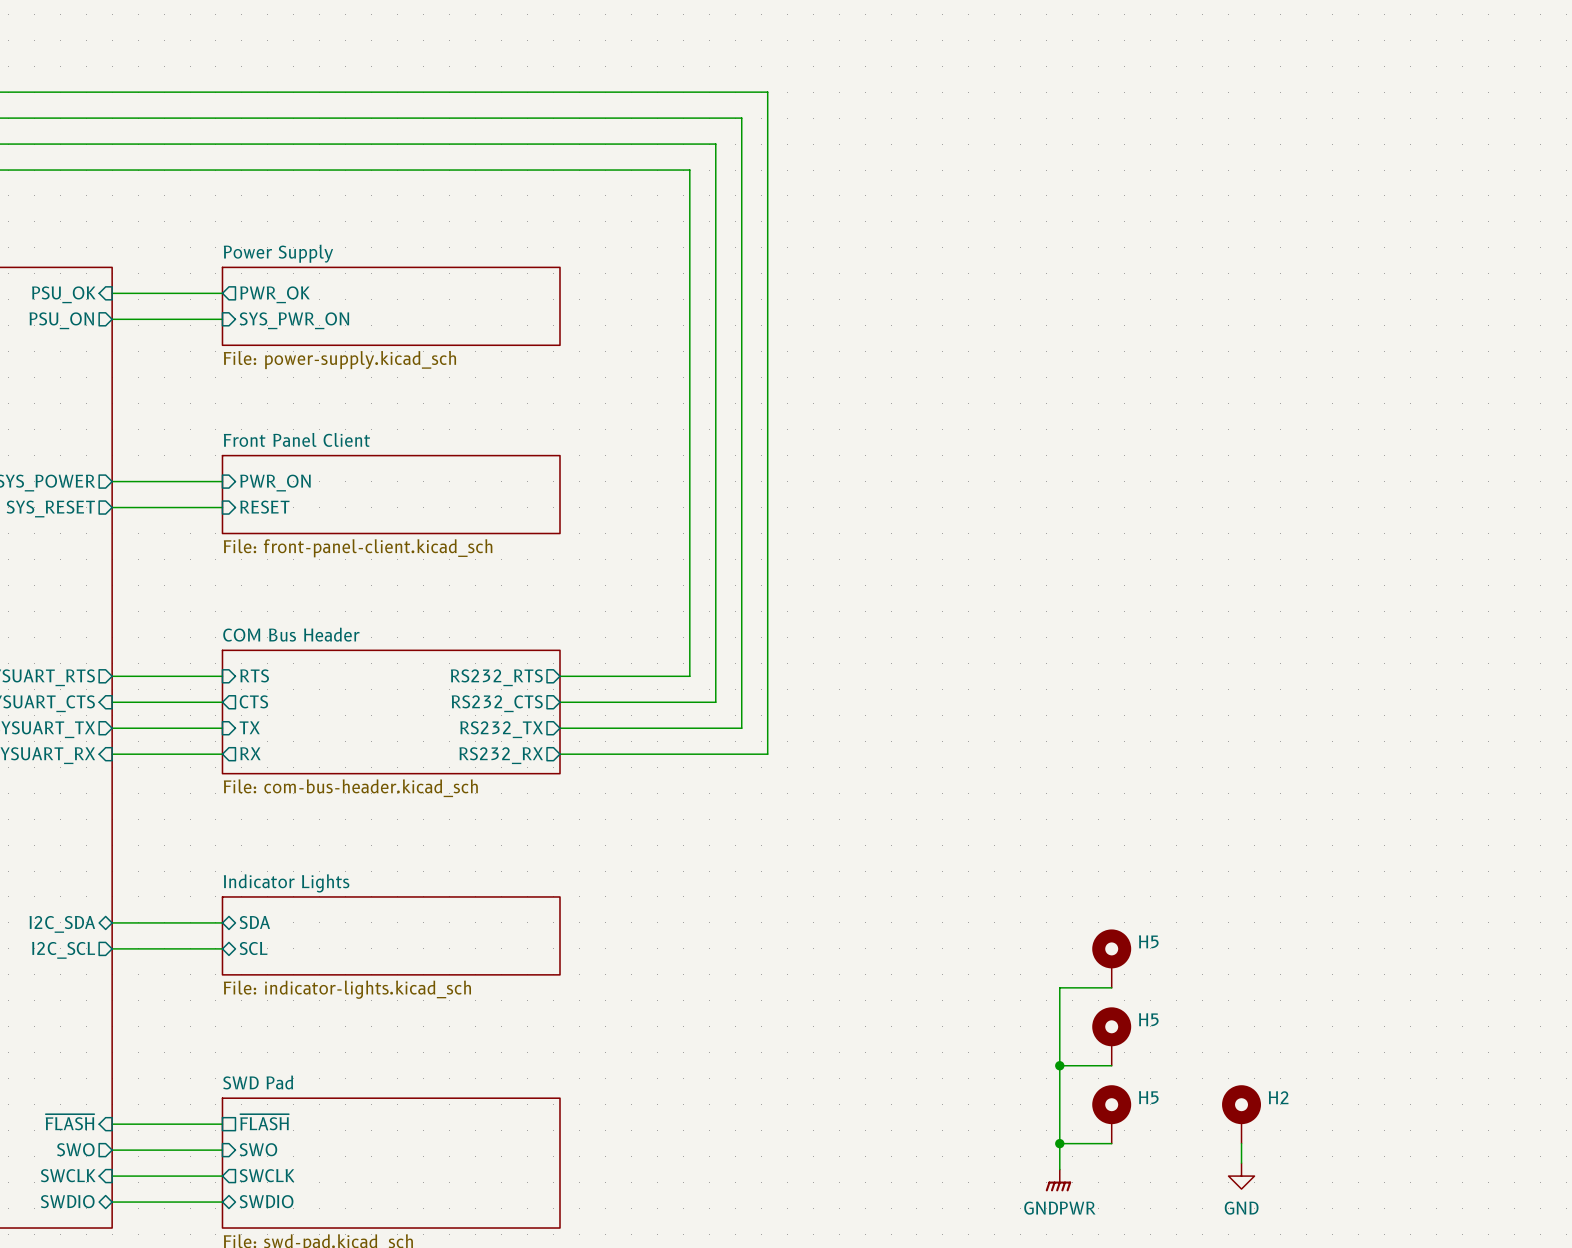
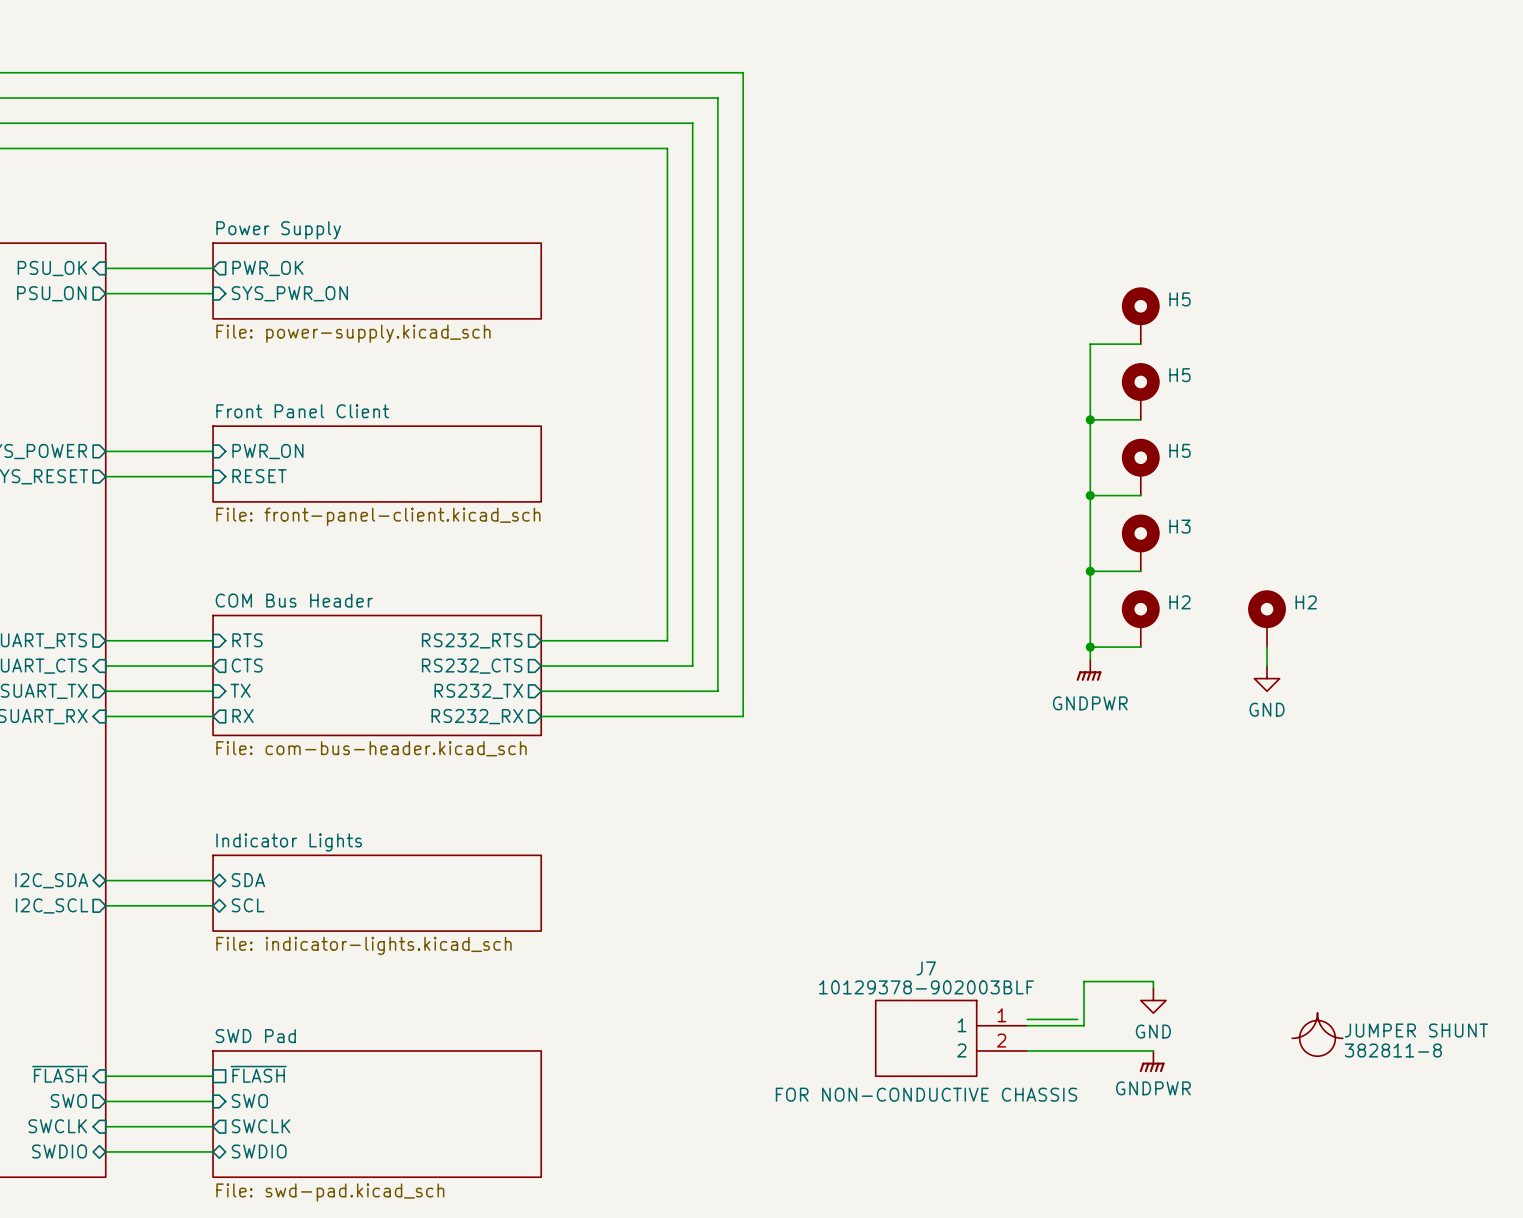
H5: none -> (1140, 315)
wire: none -> (1140, 344) (1090, 344) (1090, 659)
H5: none -> (1140, 391)
wire: none -> (1090, 419) (1140, 419)
junction: none -> (1090, 419)
H5: none -> (1140, 467)
wire: none -> (1090, 495) (1140, 495)
junction: none -> (1090, 495)
H3: none -> (1140, 542)
wire: none -> (1090, 571) (1140, 571)
junction: none -> (1090, 571)
H2: none -> (1140, 618)
H2: none -> (1267, 618)
wire: none -> (1090, 647) (1140, 647)
junction: none -> (1090, 647)
wire: none -> (1267, 647) (1267, 666)
power symbol: none -> GNDPWR (1089, 670)
power symbol: none -> GND (1267, 678)
H5: (1111, 958) -> none
wire: (1111, 987) (1059, 987) (1059, 1169) -> none
wire: none -> (1153, 987) (1153, 981) (1083, 981) (1083, 1025) (1027, 1025)
H5: (1111, 1036) -> none
junction: (1059, 1065) -> none
part: none -> 382811-8 (1317, 1034)
J7: none -> 10129378-902003BLF (951, 1038)
wire: none -> (1027, 1050) (1153, 1050)
H5: (1111, 1114) -> none
H2: (1241, 1114) -> none
wire: (1059, 1143) (1111, 1143) -> none
junction: (1059, 1143) -> none
wire: (1241, 1143) (1241, 1163) -> none
power symbol position: GND (1241, 1176) -> GND (1153, 1000)
power symbol position: GNDPWR (1058, 1180) -> GNDPWR (1152, 1061)

